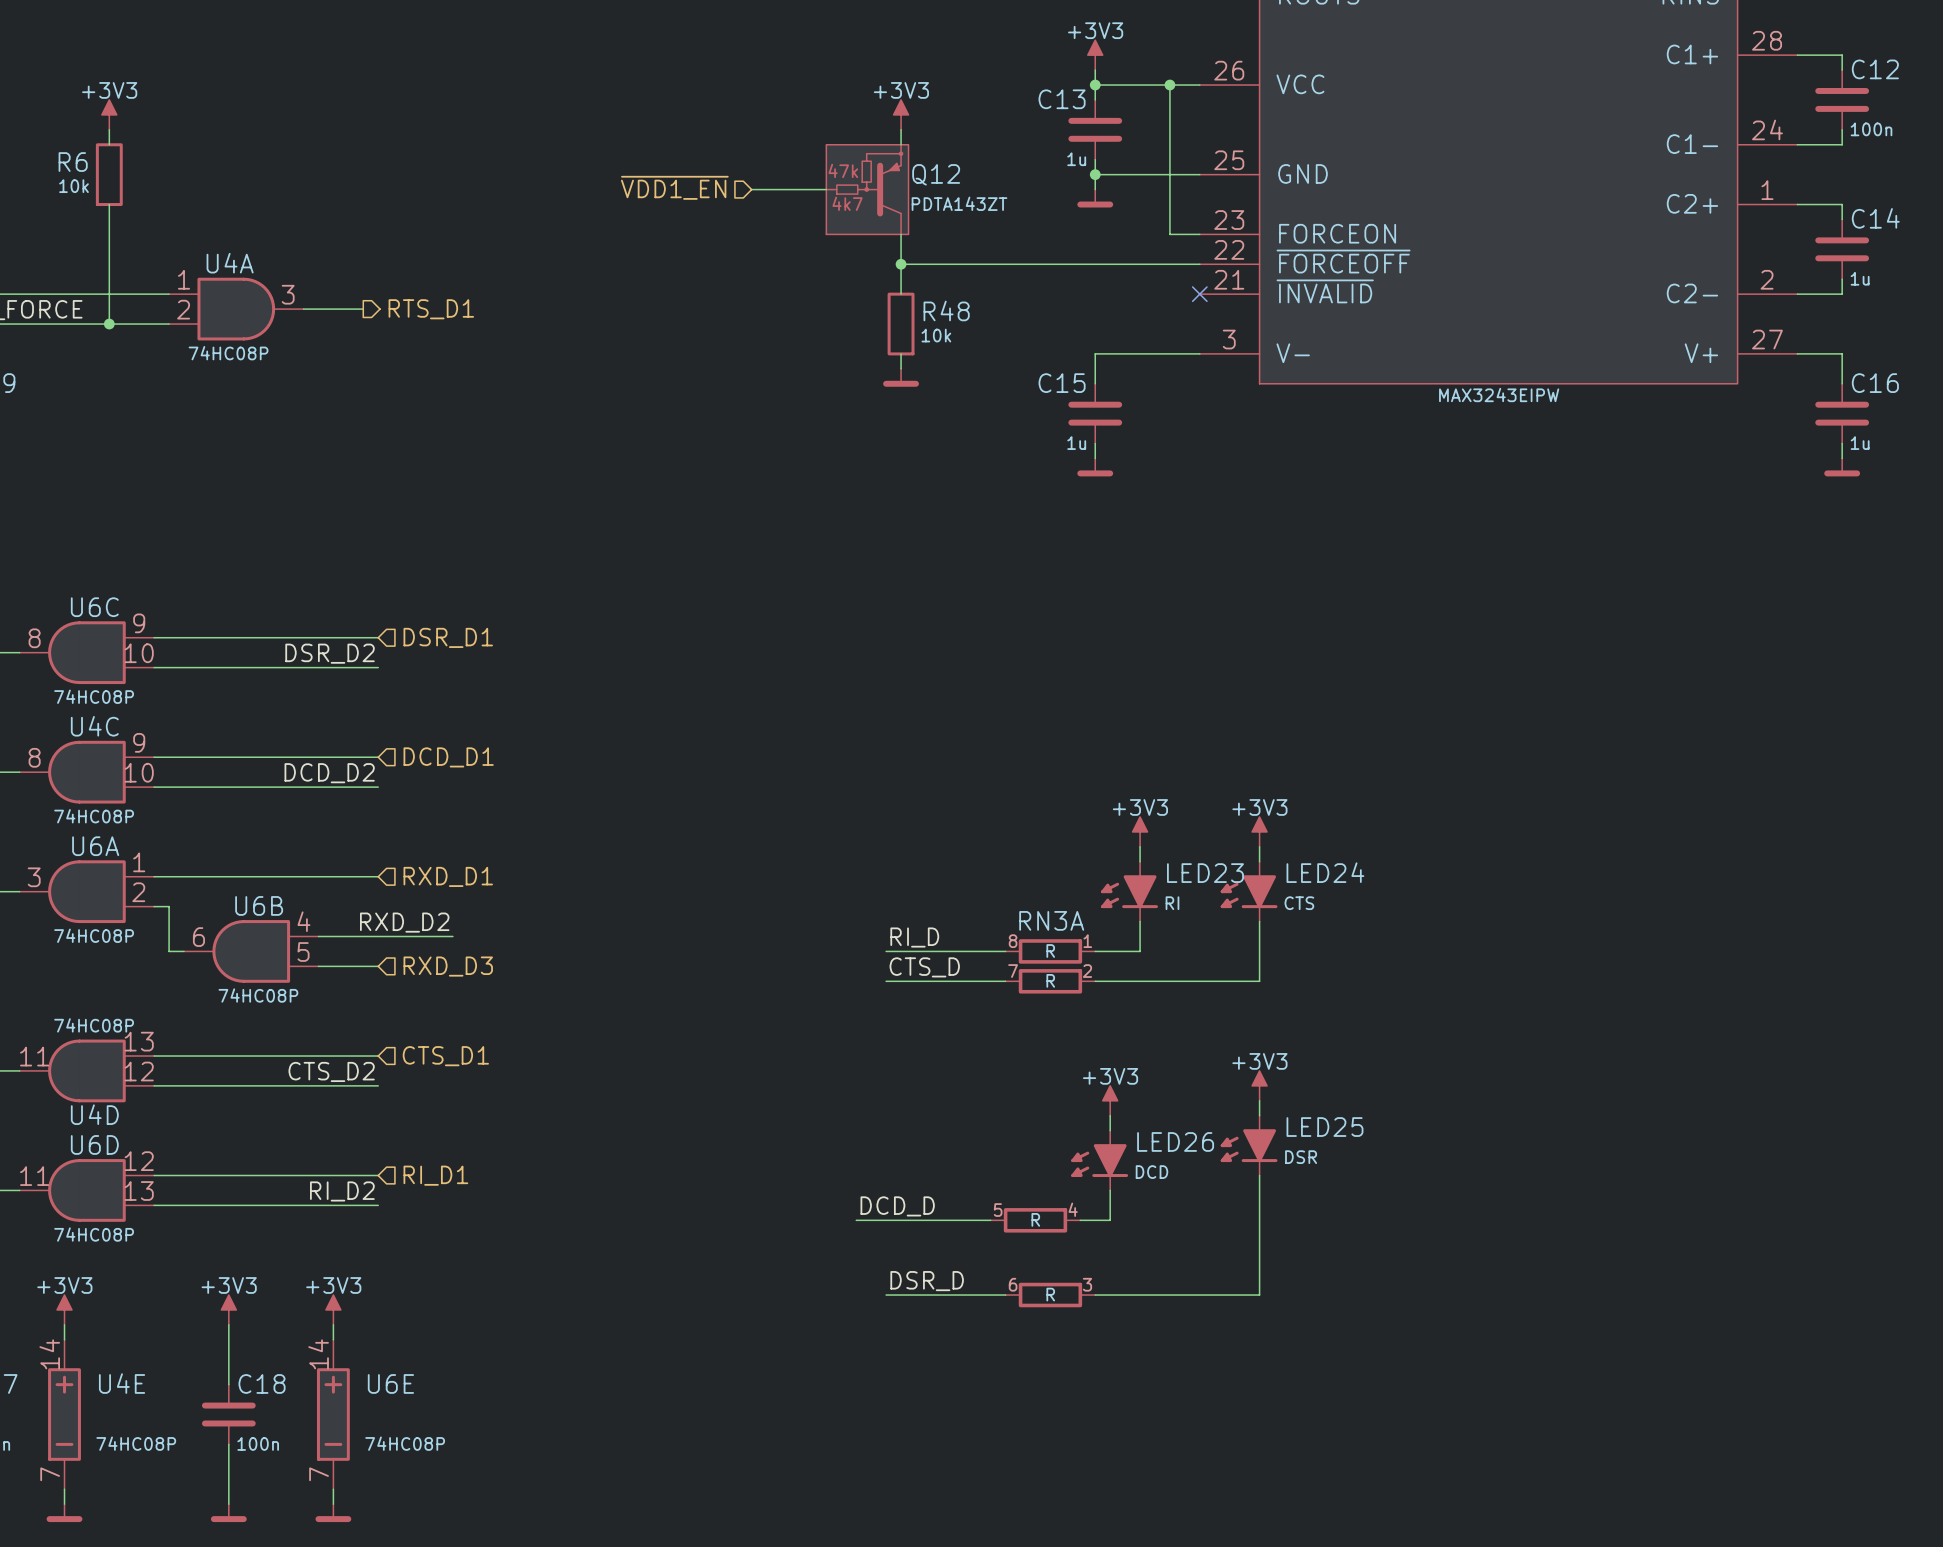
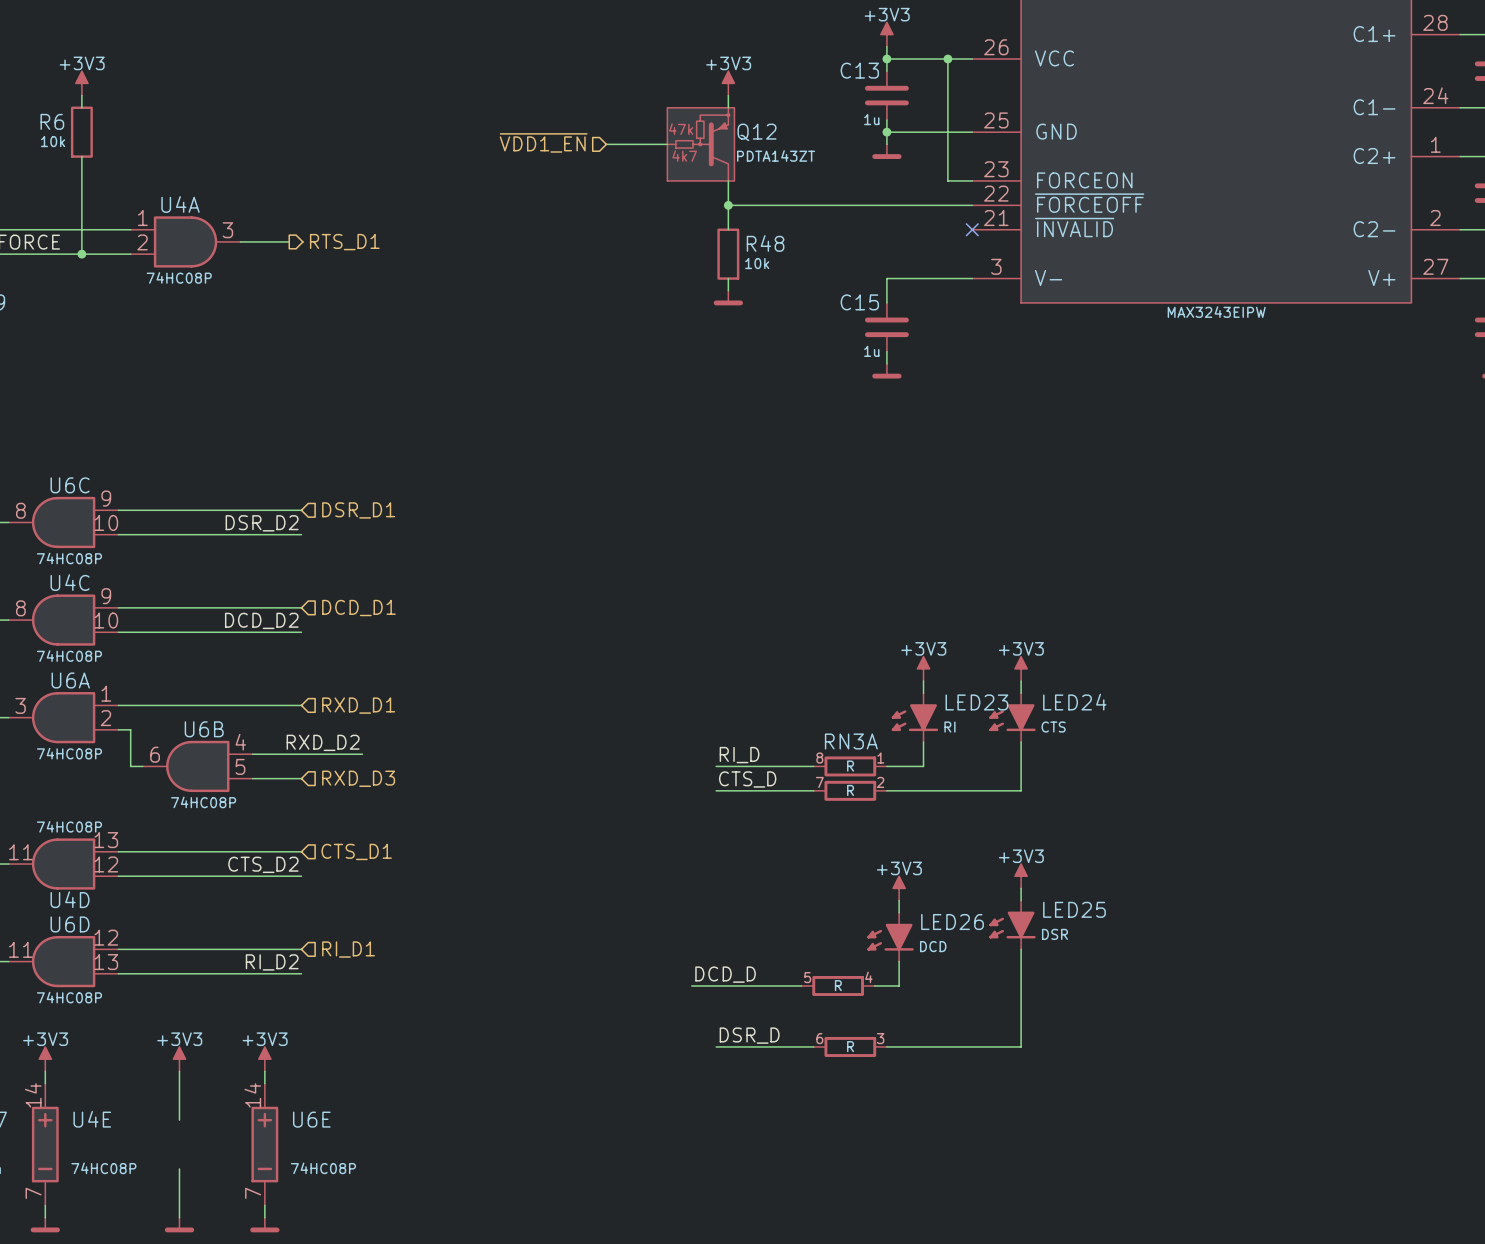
C18: 100n (228, 1414) -> none

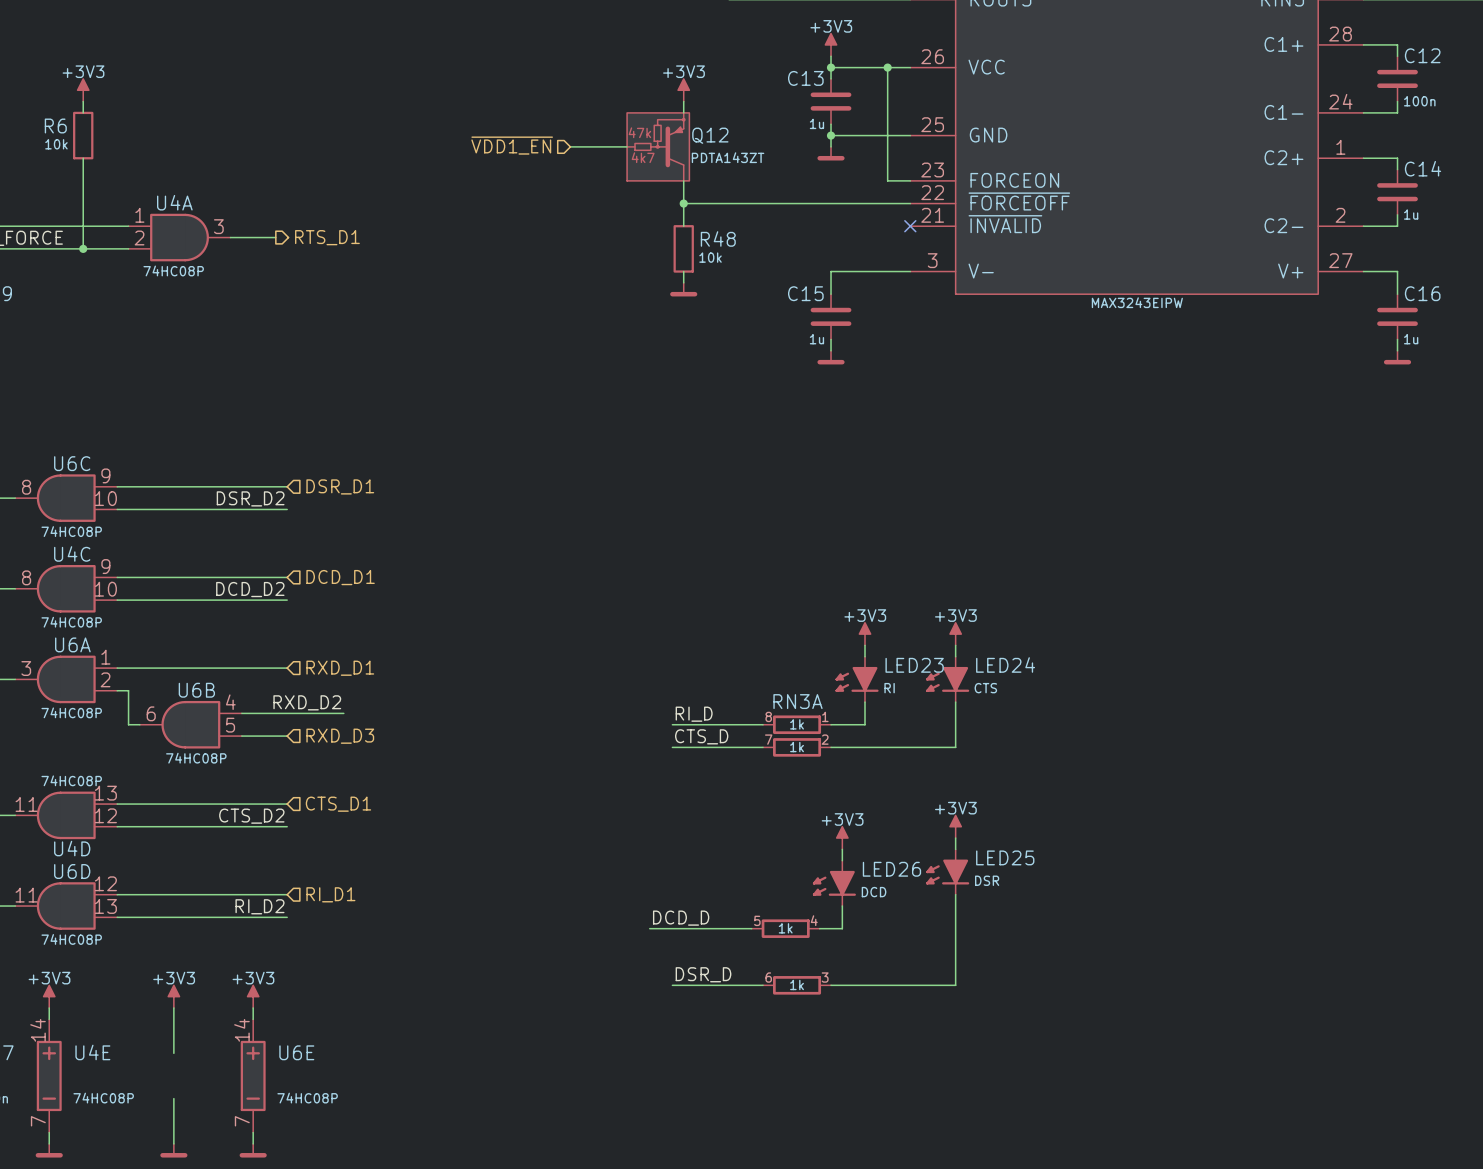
RN3A value: R (850, 766) -> 1k (797, 724)
part value: R (850, 790) -> 1k (797, 747)
part value: R (838, 985) -> 1k (785, 928)
part value: R (850, 1046) -> 1k (797, 984)

